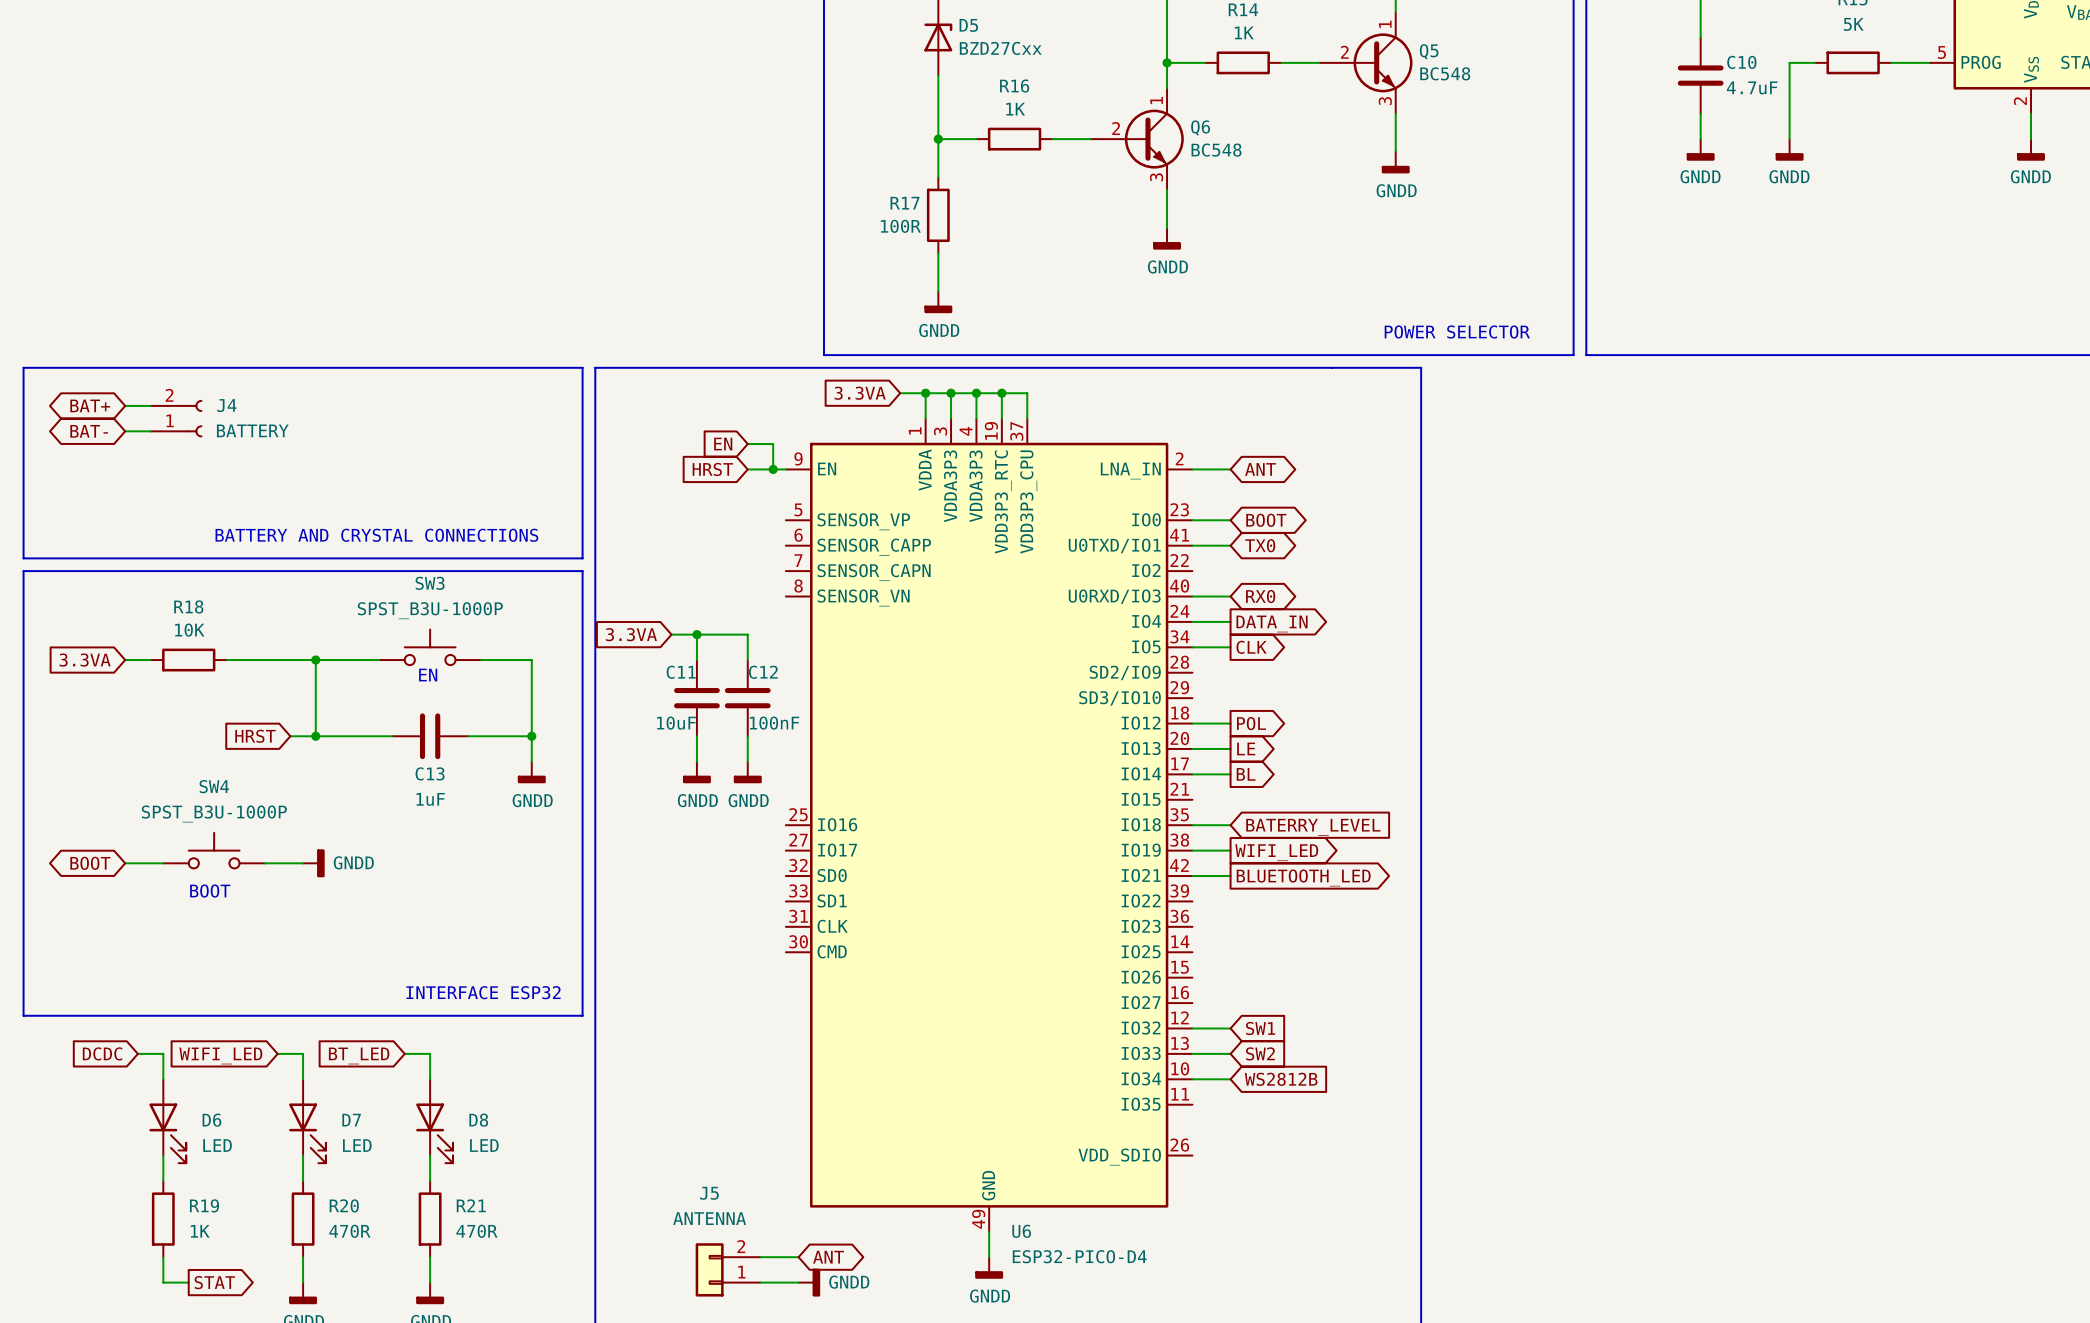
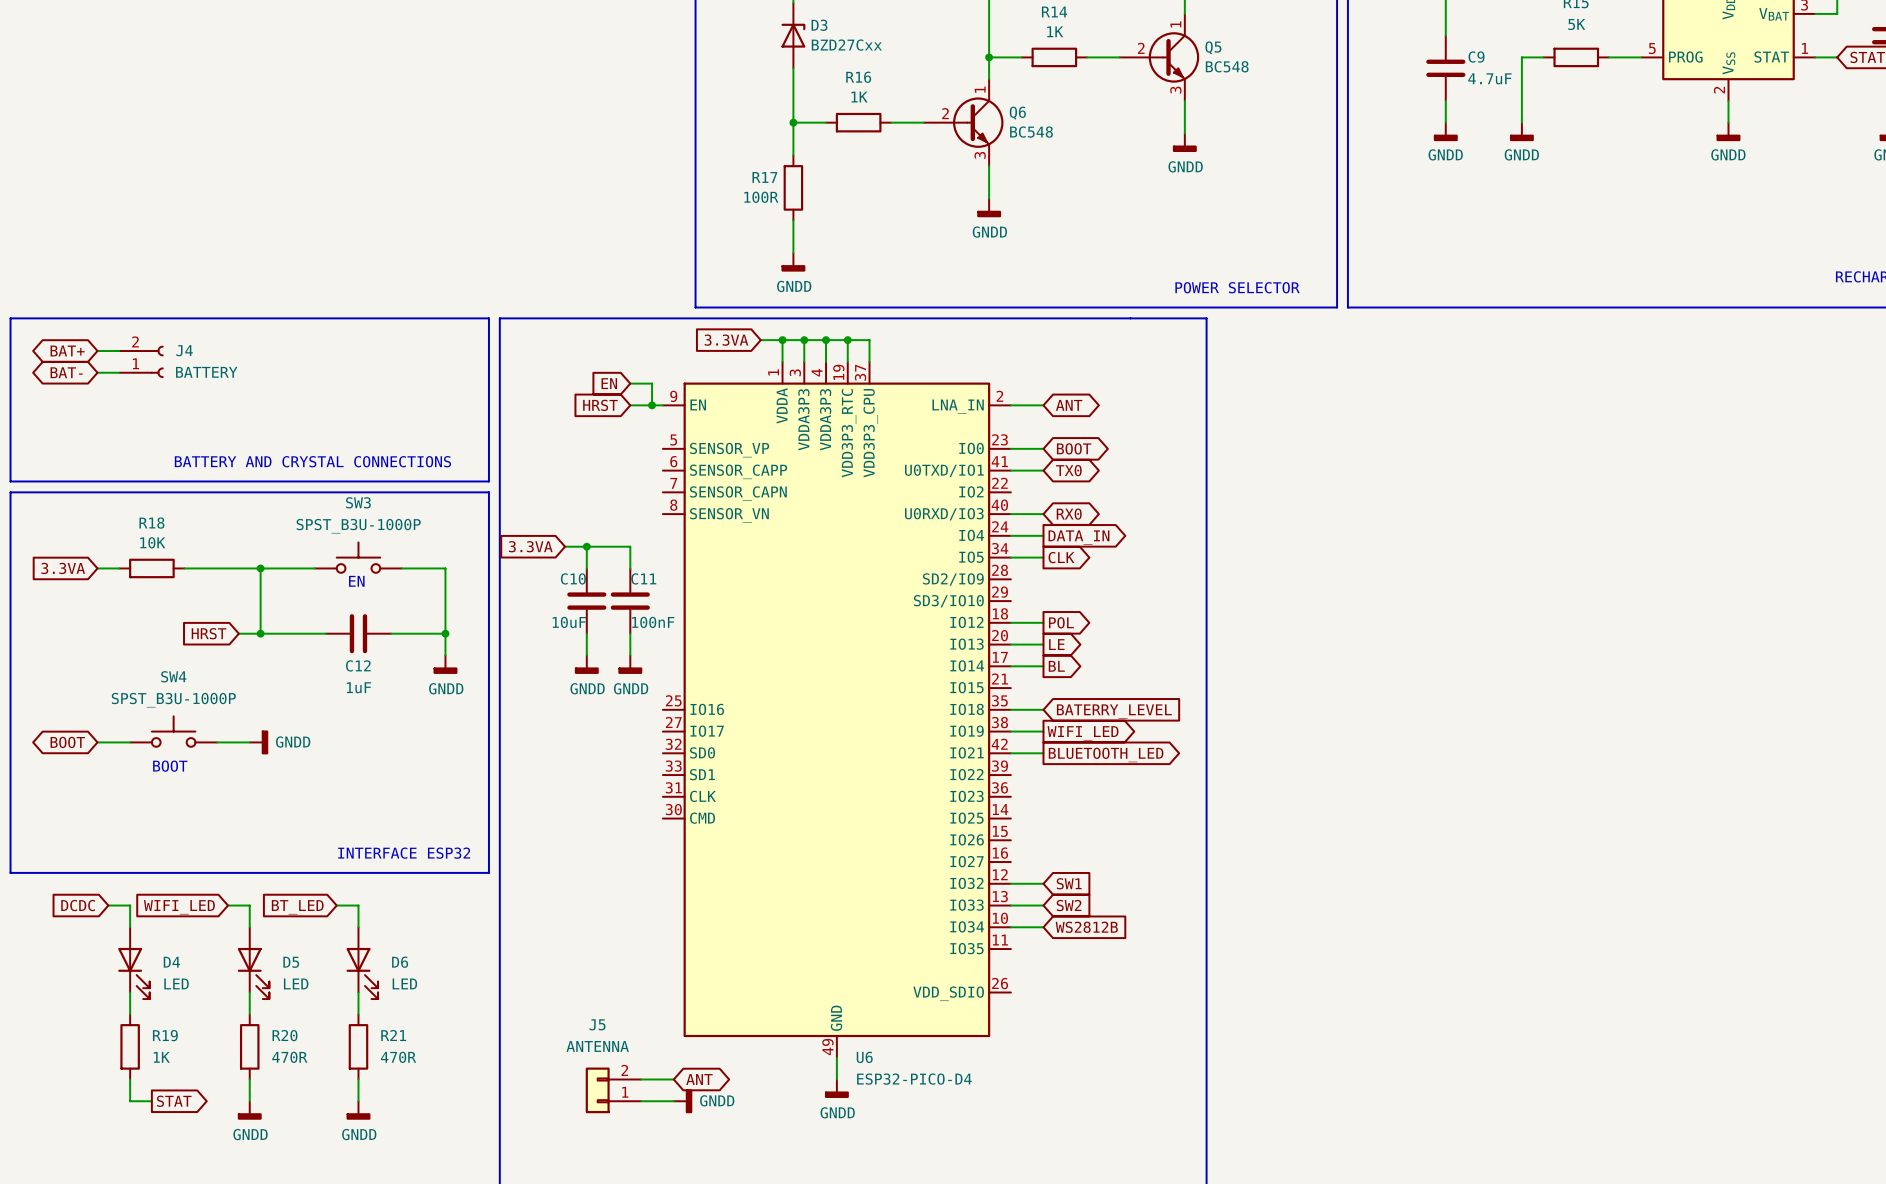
D5 name: D5 (968, 25) -> D3 (819, 25)
C10 name: C10 (1741, 62) -> C9 (1476, 57)
C11 name: C11 (681, 672) -> C10 (573, 578)
C12 name: C12 (763, 672) -> C11 (643, 578)
C13 name: C13 (430, 773) -> C12 (358, 665)
D6 name: D6 (211, 1120) -> D4 (171, 962)
D7 name: D7 (351, 1120) -> D5 (291, 962)
D8 name: D8 (478, 1120) -> D6 (400, 962)

